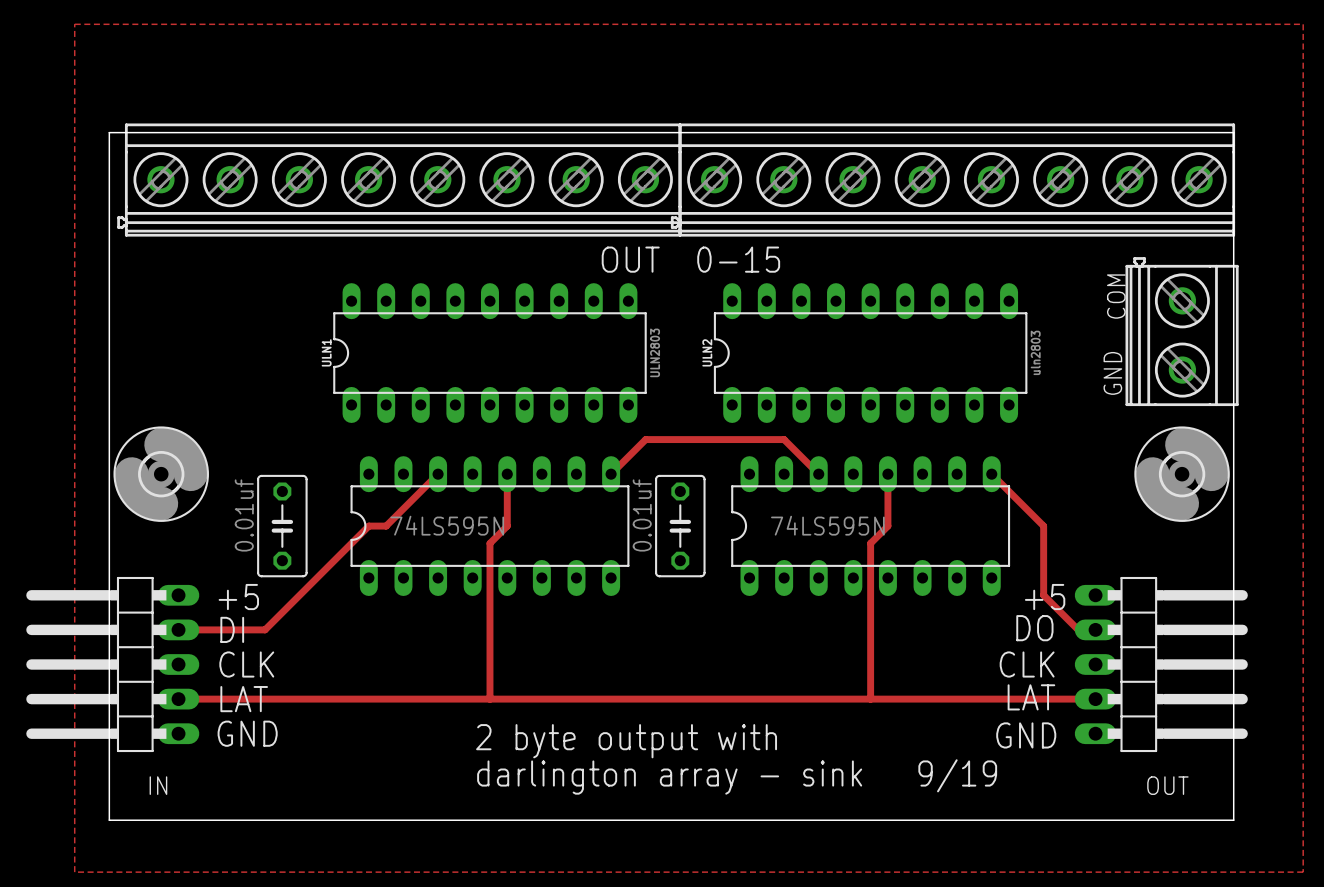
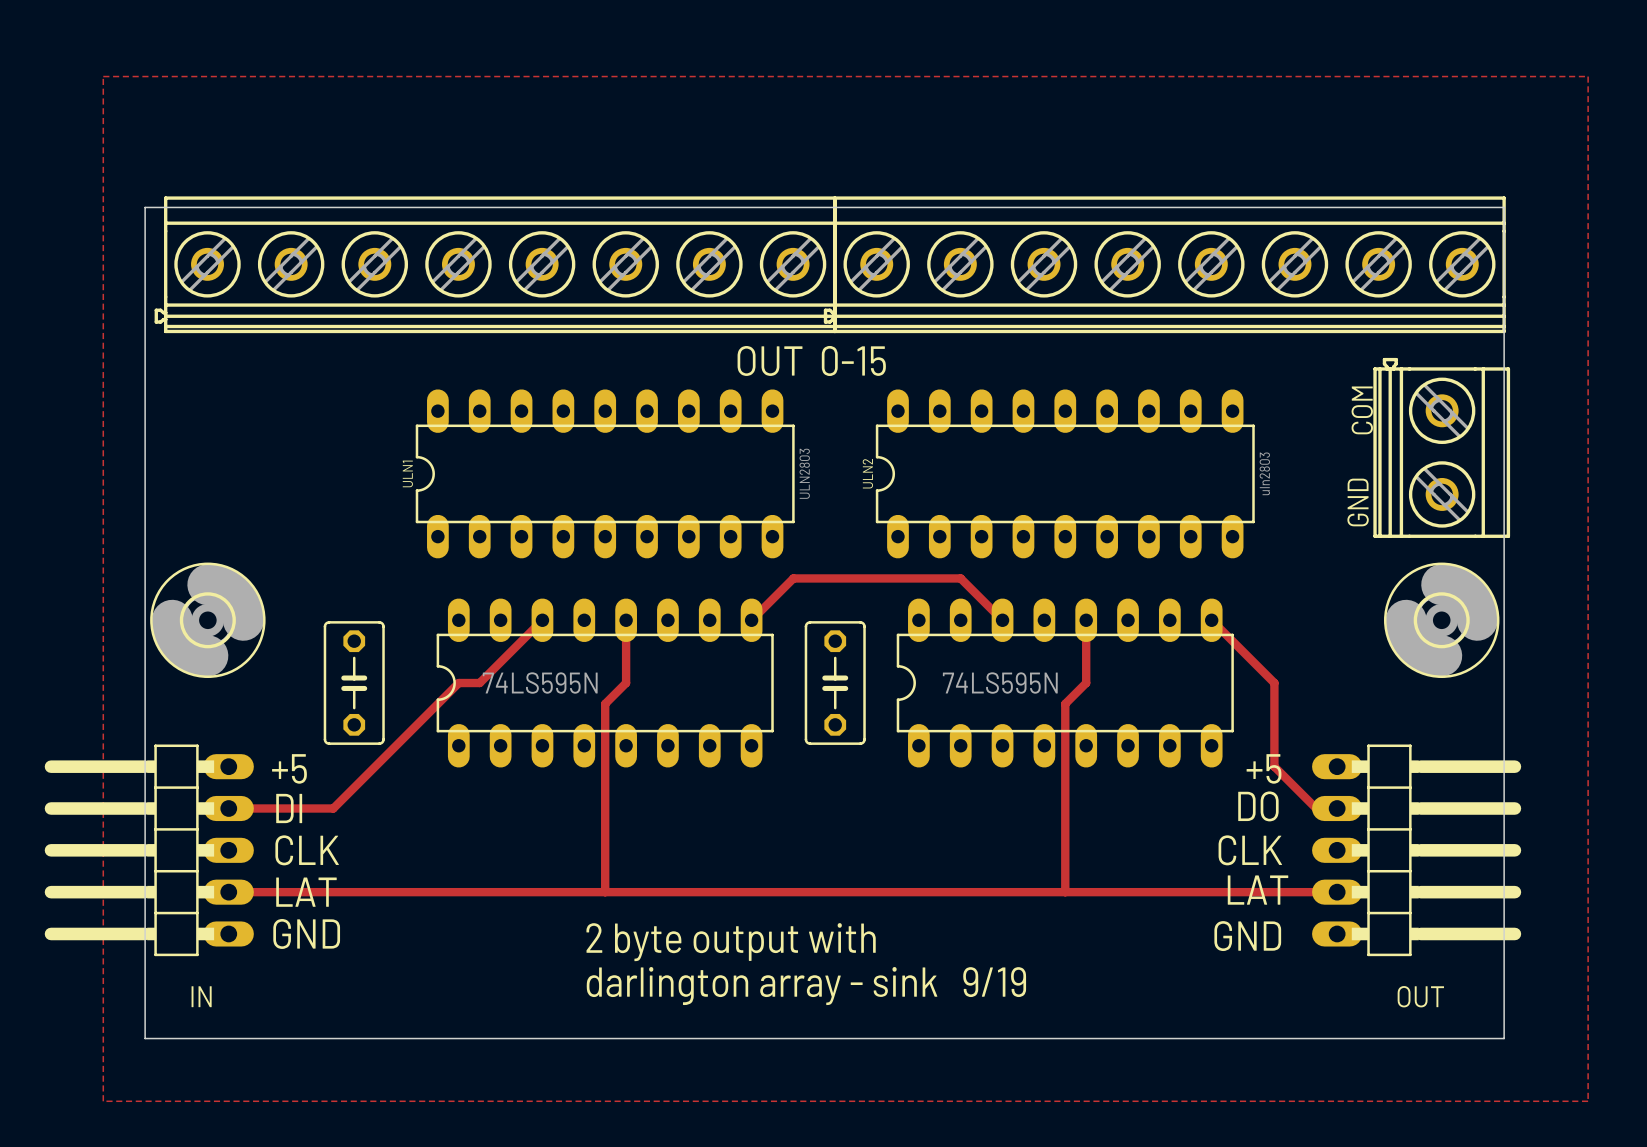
part value: 0.01uf (244, 515) -> none
part value: 0.01uf (642, 515) -> none

